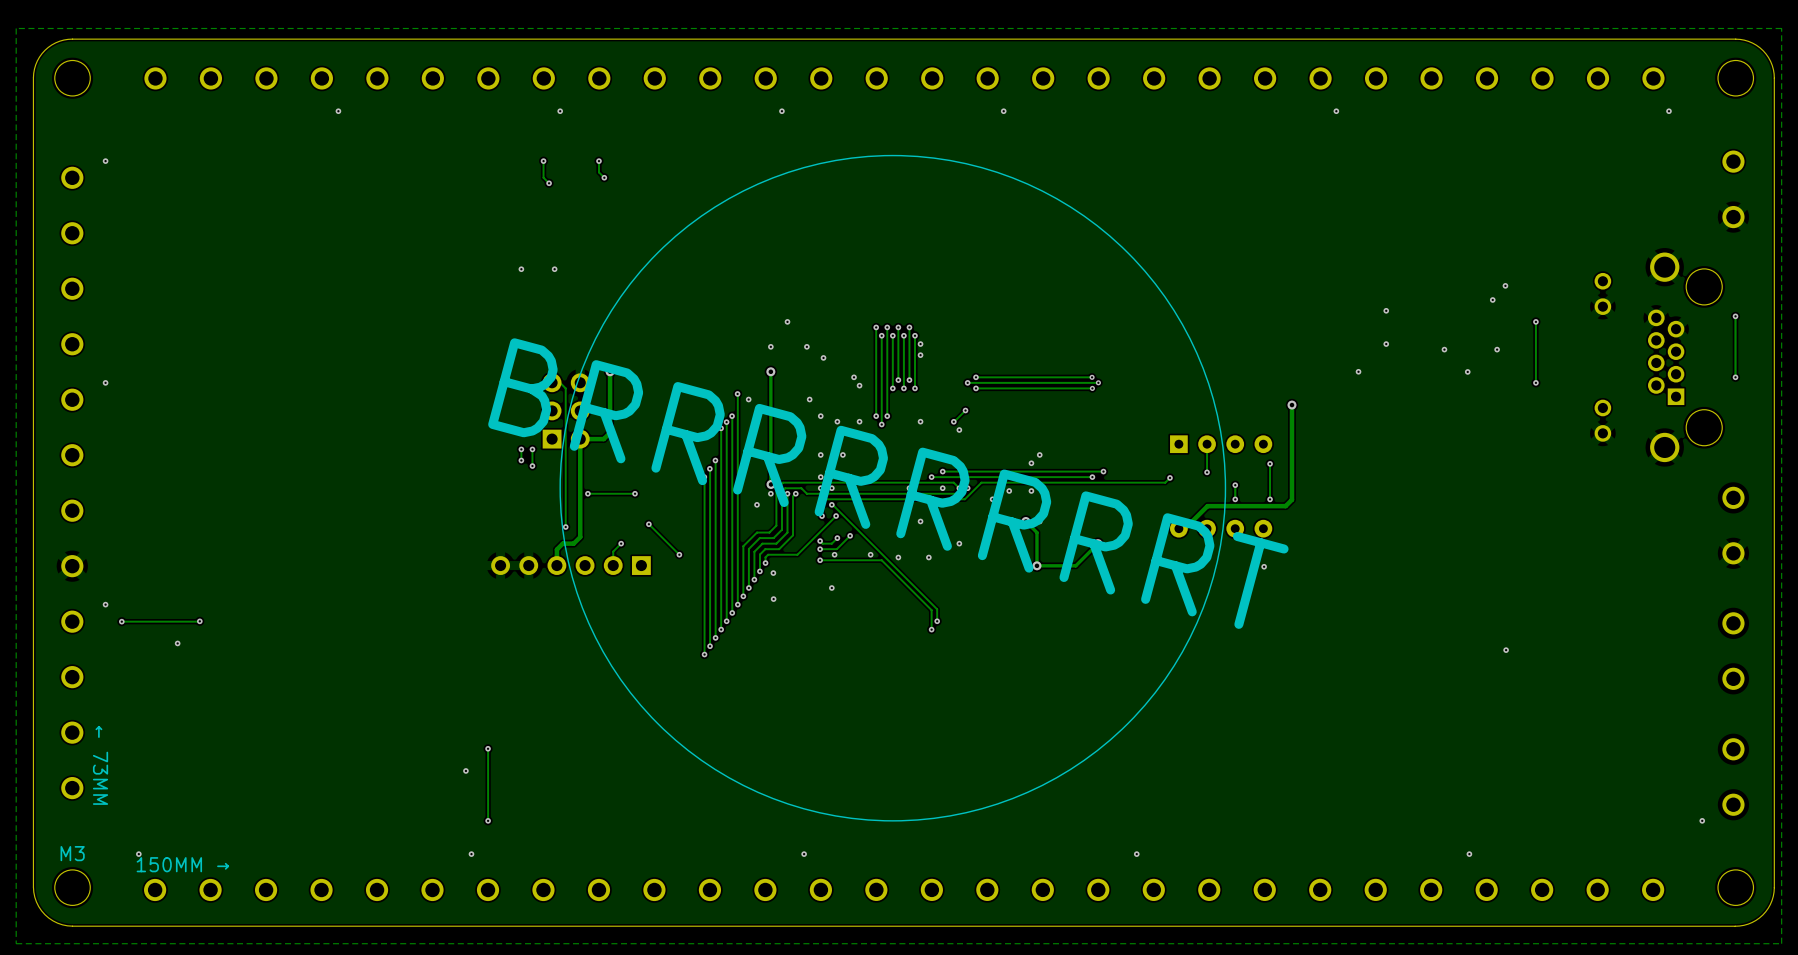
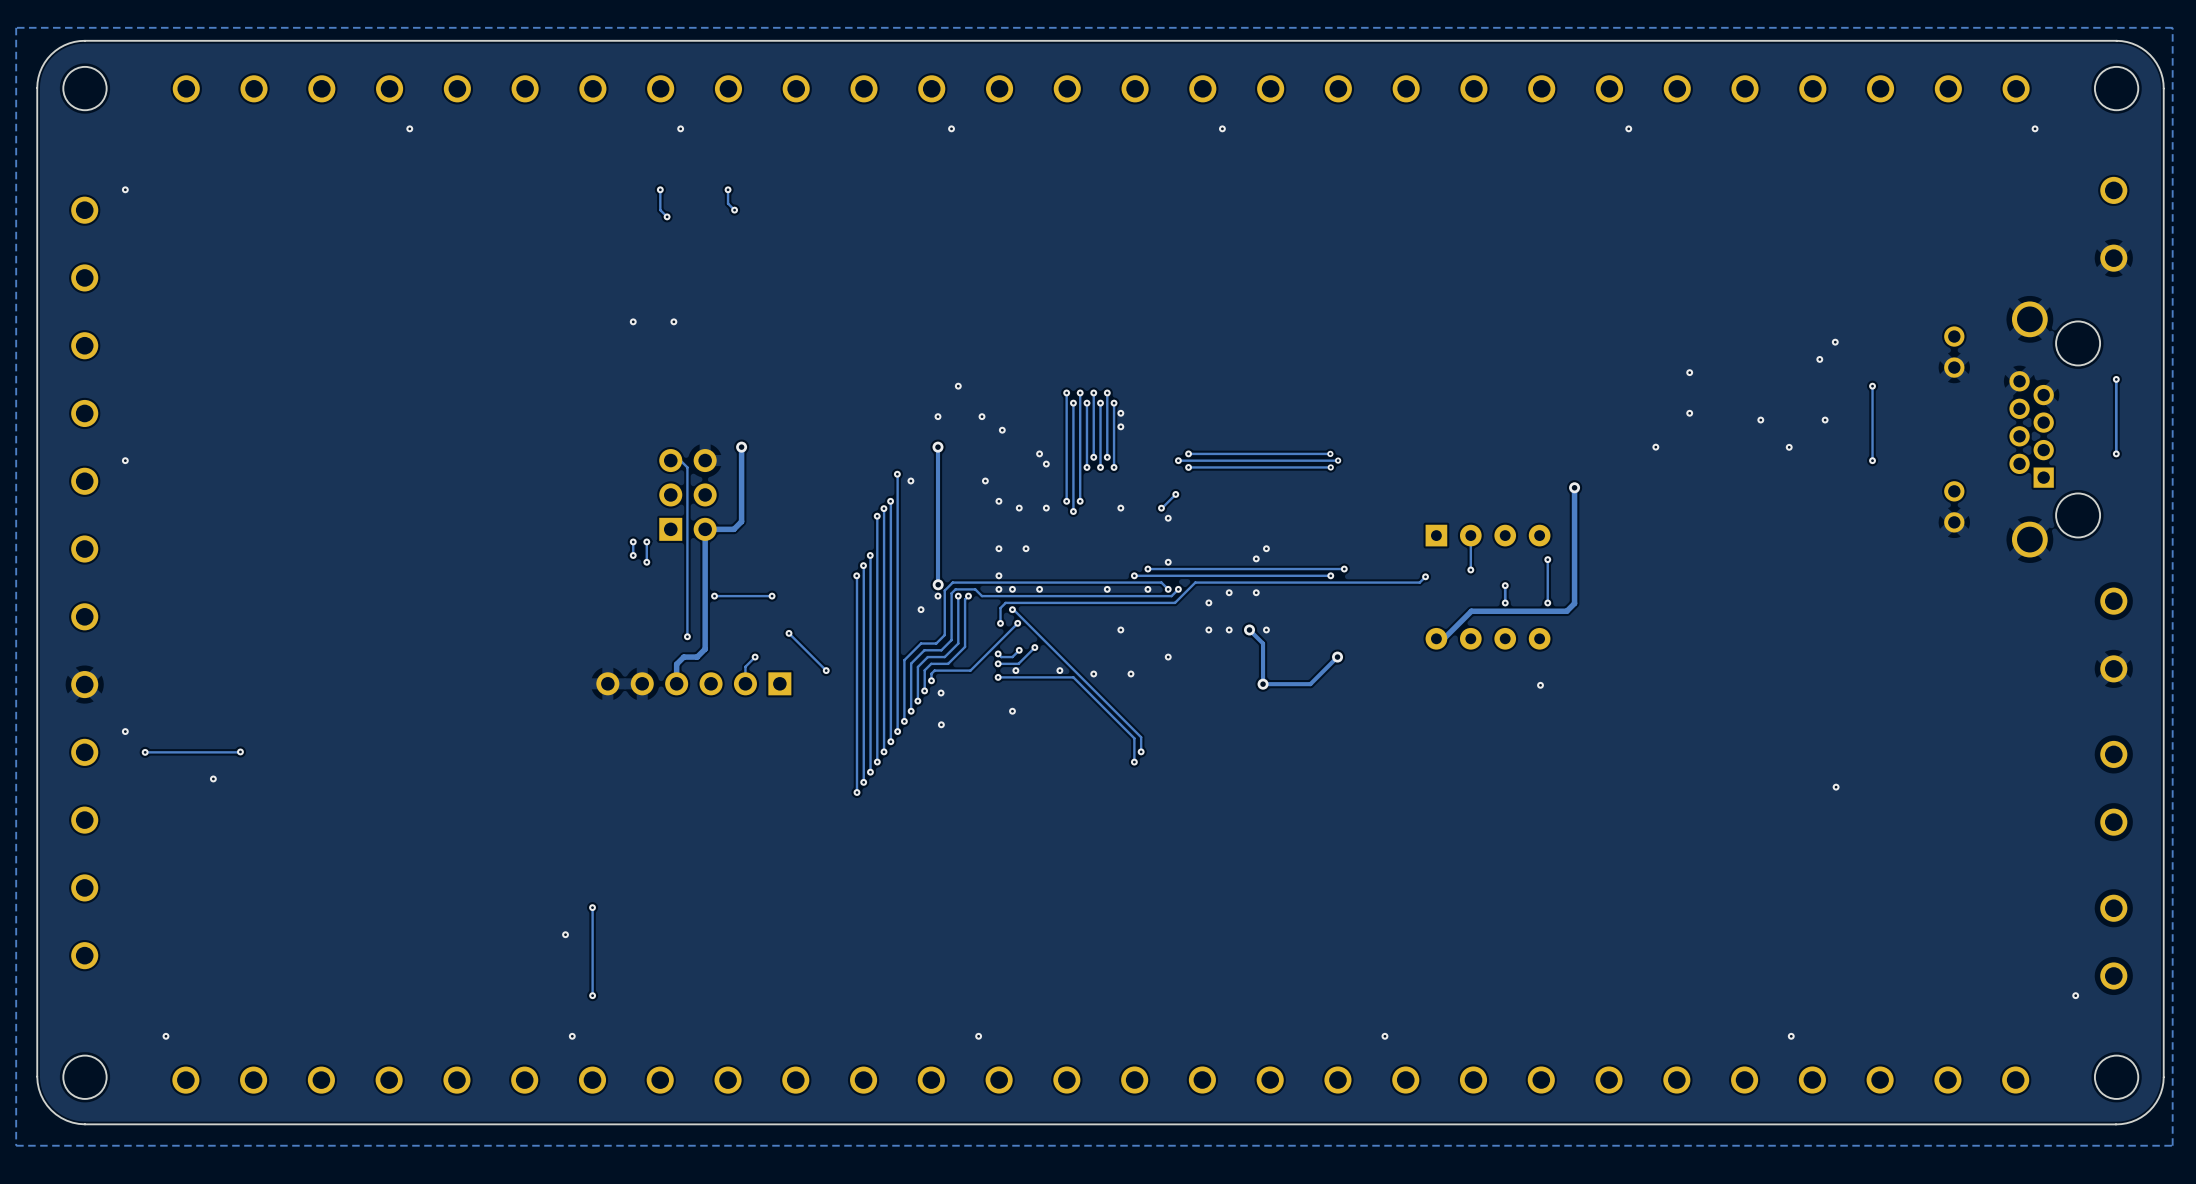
drawing: [559, 154, 1227, 822] -> none
text: BRRRRRRRRT (888, 483) -> none
text: ← 73MM (100, 765) -> none
text: M3 (72, 853) -> none
text: 150MM → (182, 864) -> none

